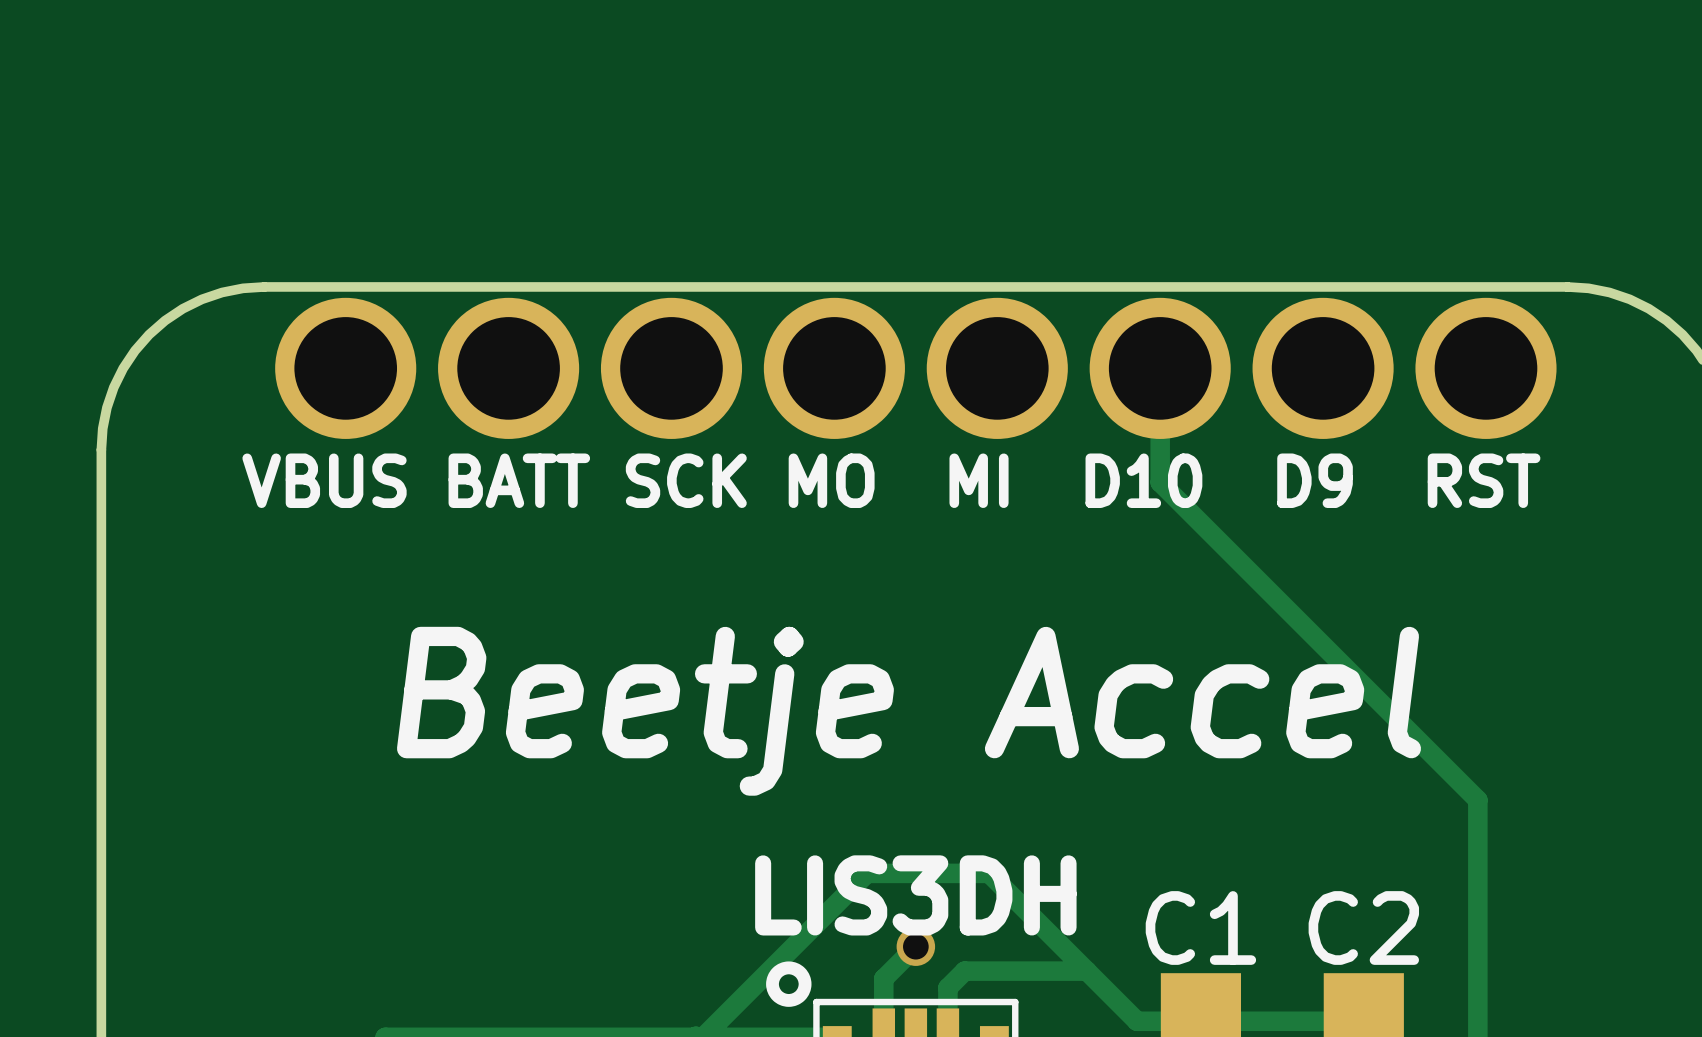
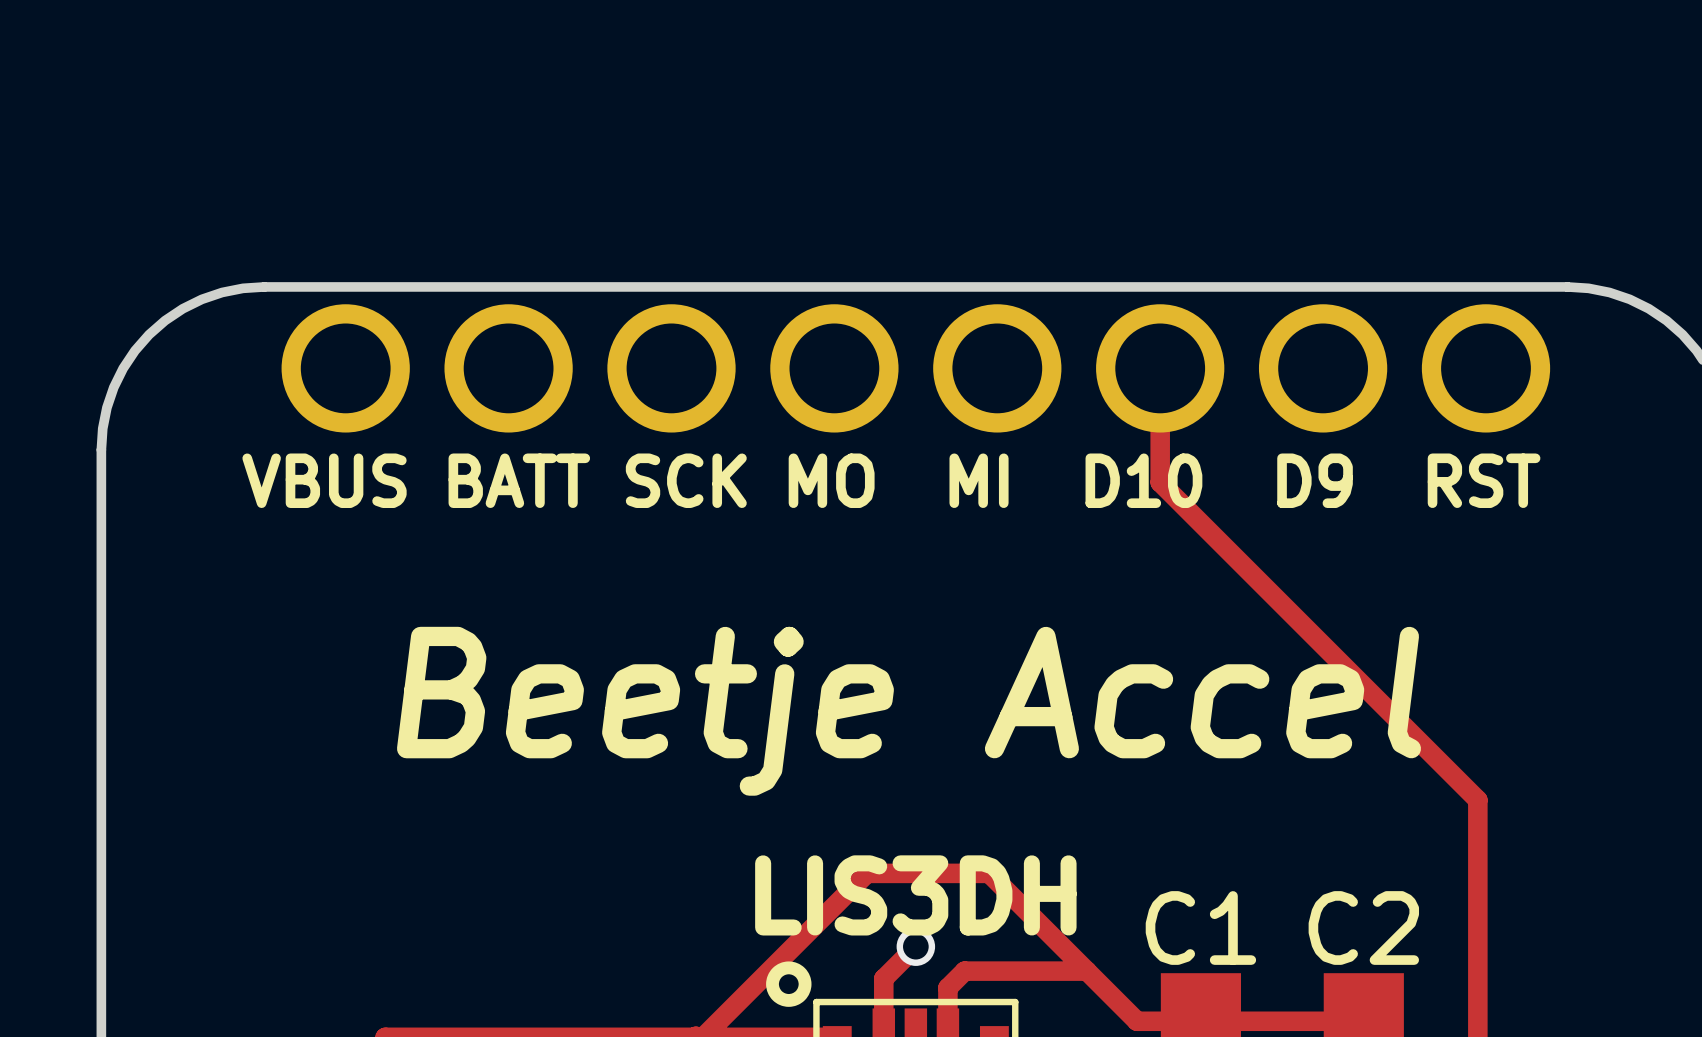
part footprint: [275, 297, 1557, 439] -> [281, 304, 1551, 433]

